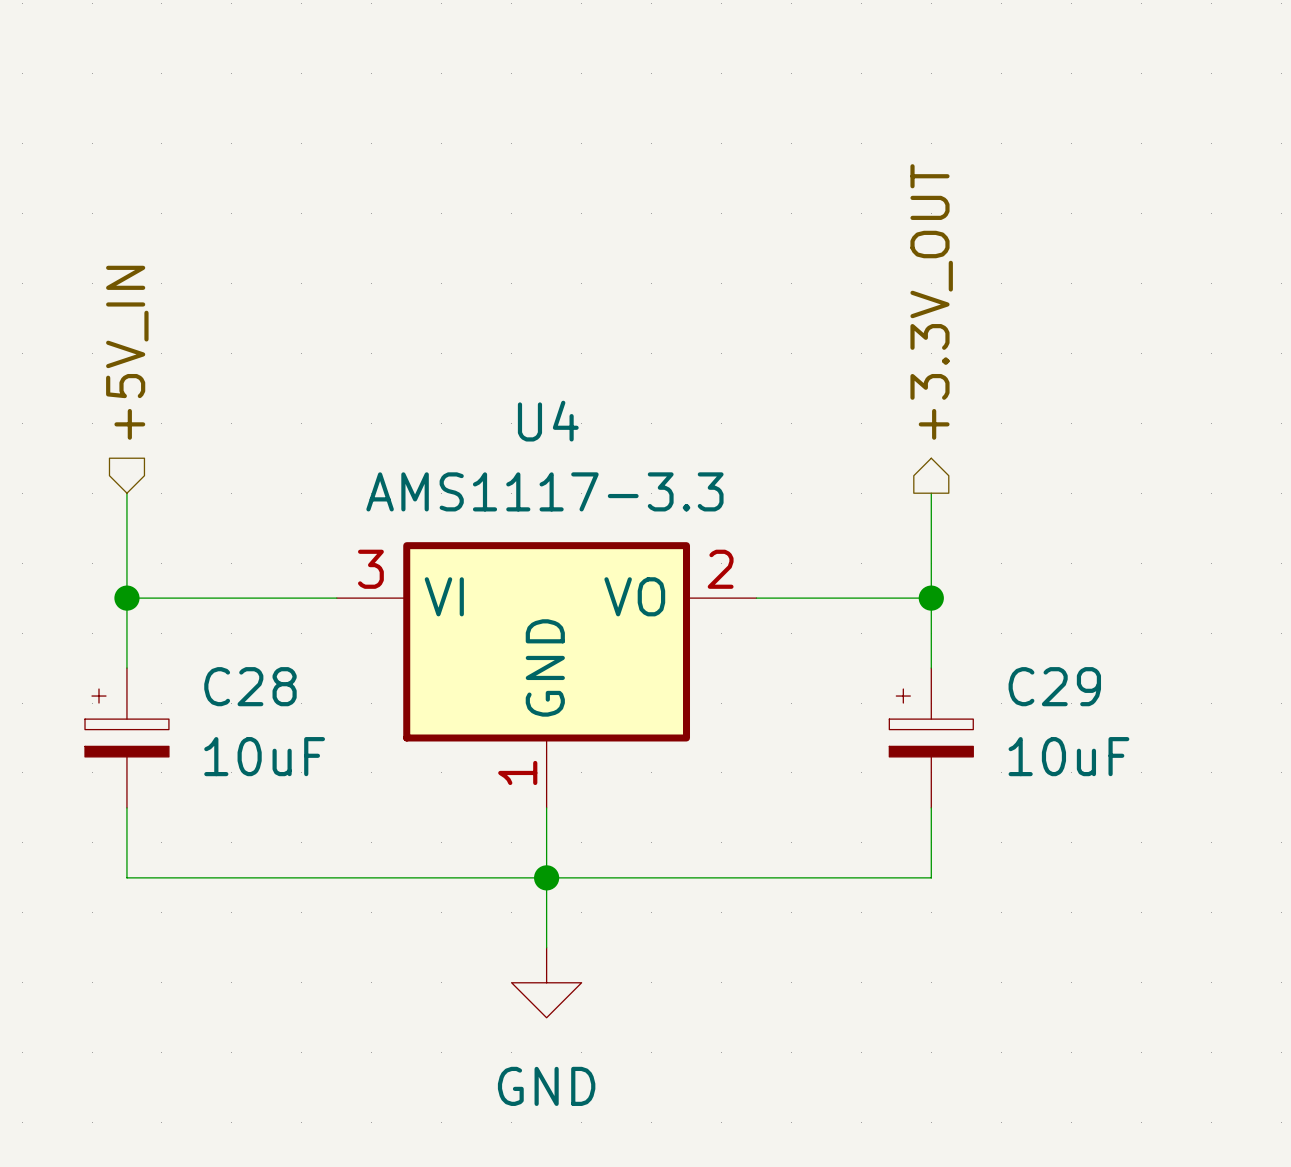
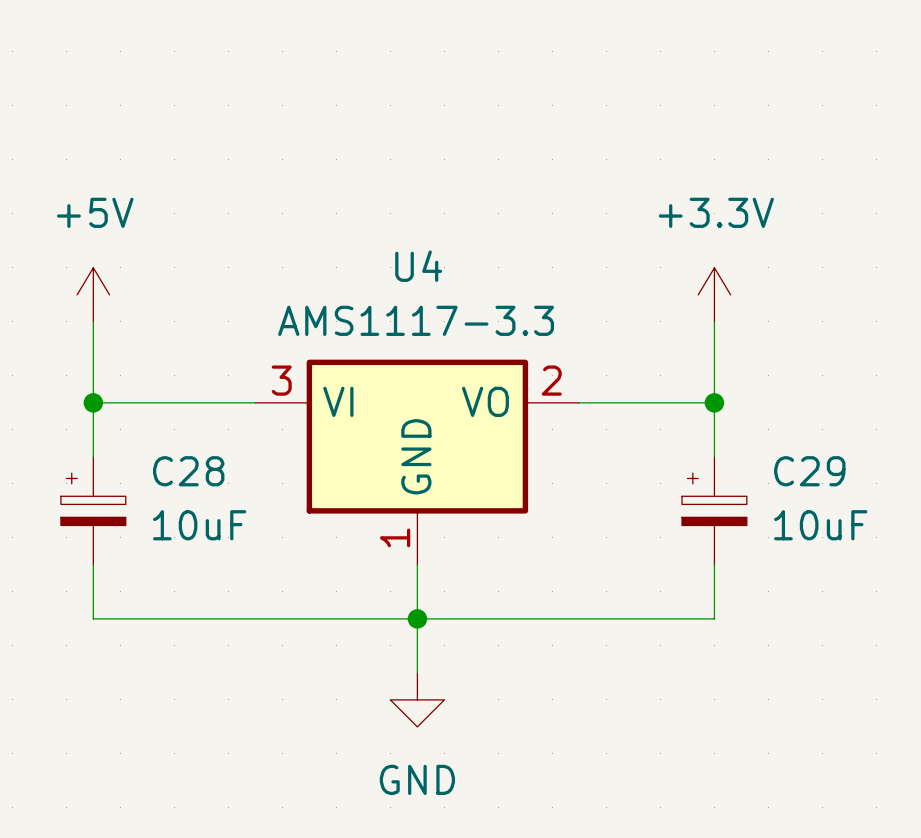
hierarchical label: +3.3V_OUT (931, 301) -> none
hierarchical label: +5V_IN (127, 352) -> none
power symbol: none -> +5V (93, 294)
power symbol: none -> +3.3V (714, 294)

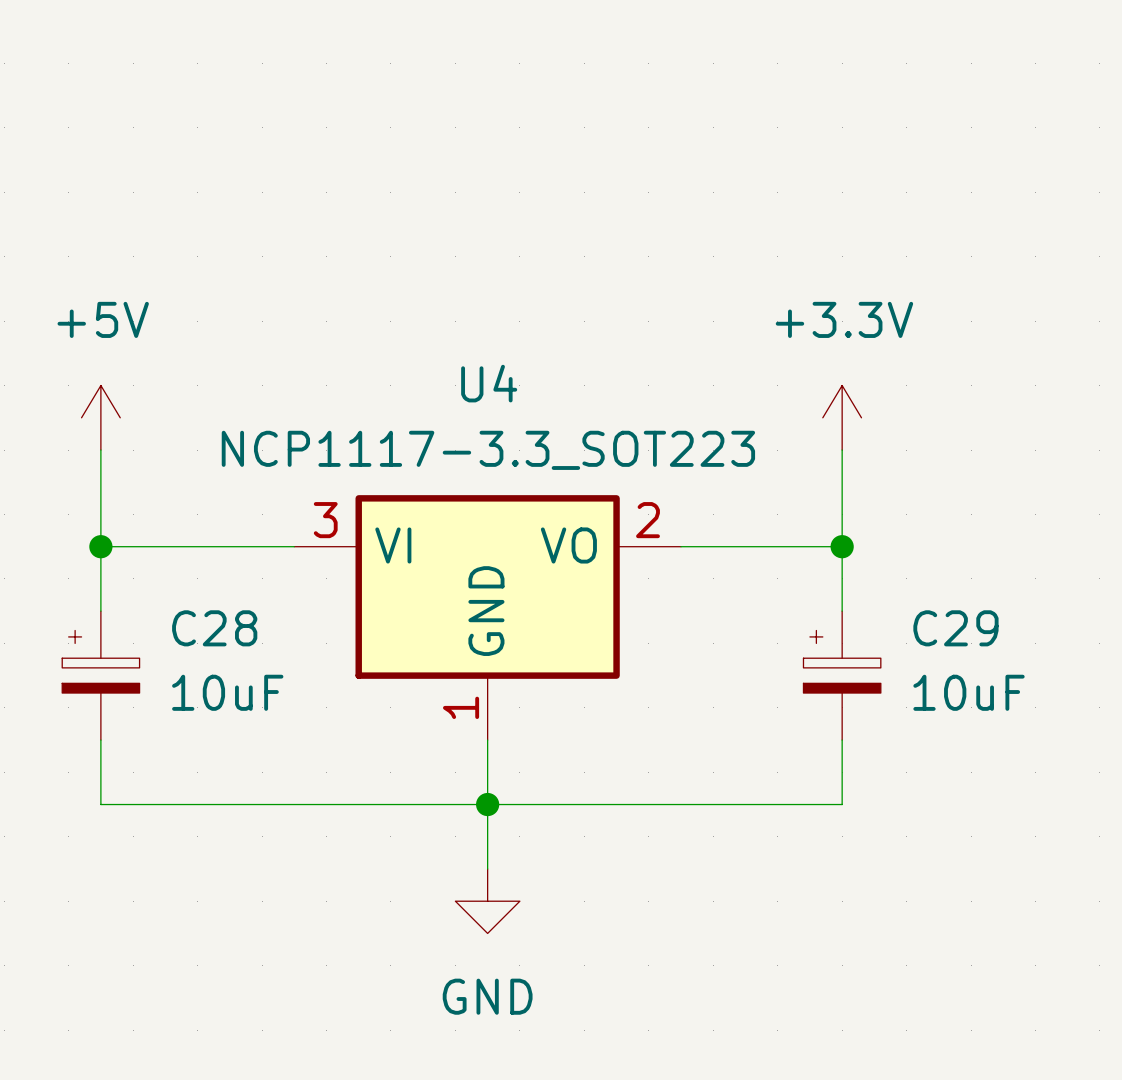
U4 value: AMS1117-3.3 (416, 320) -> NCP1117-3.3_SOT223 (488, 450)

